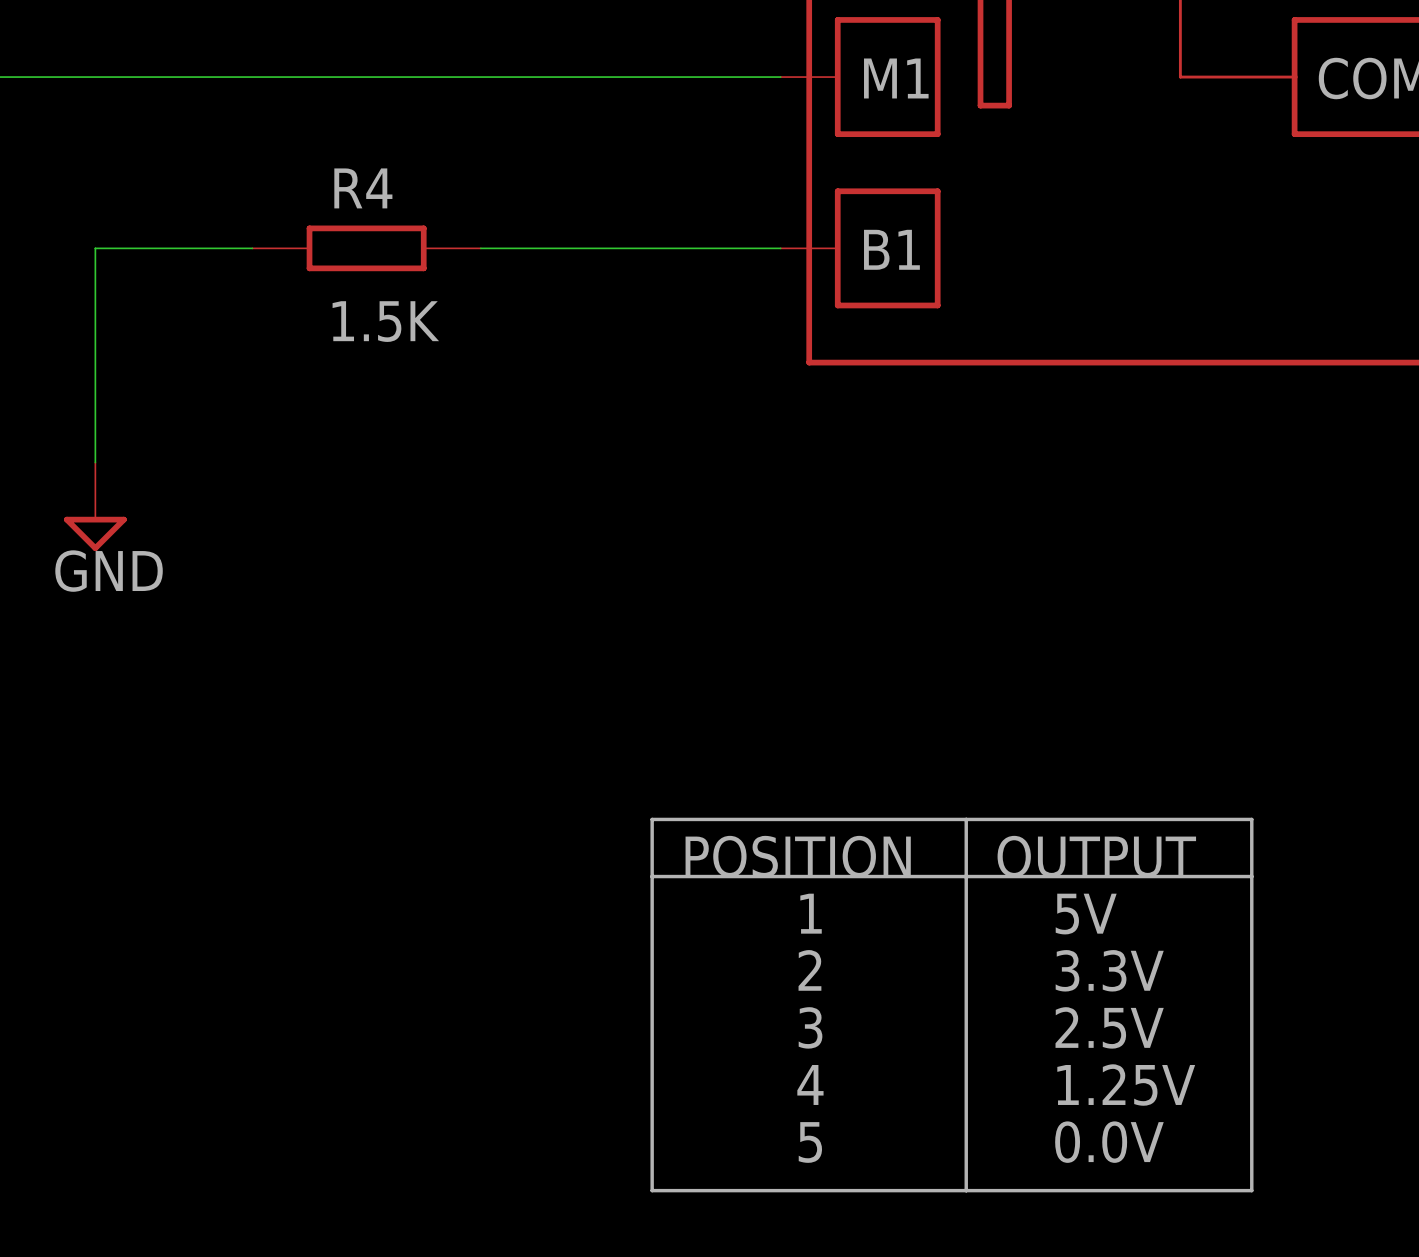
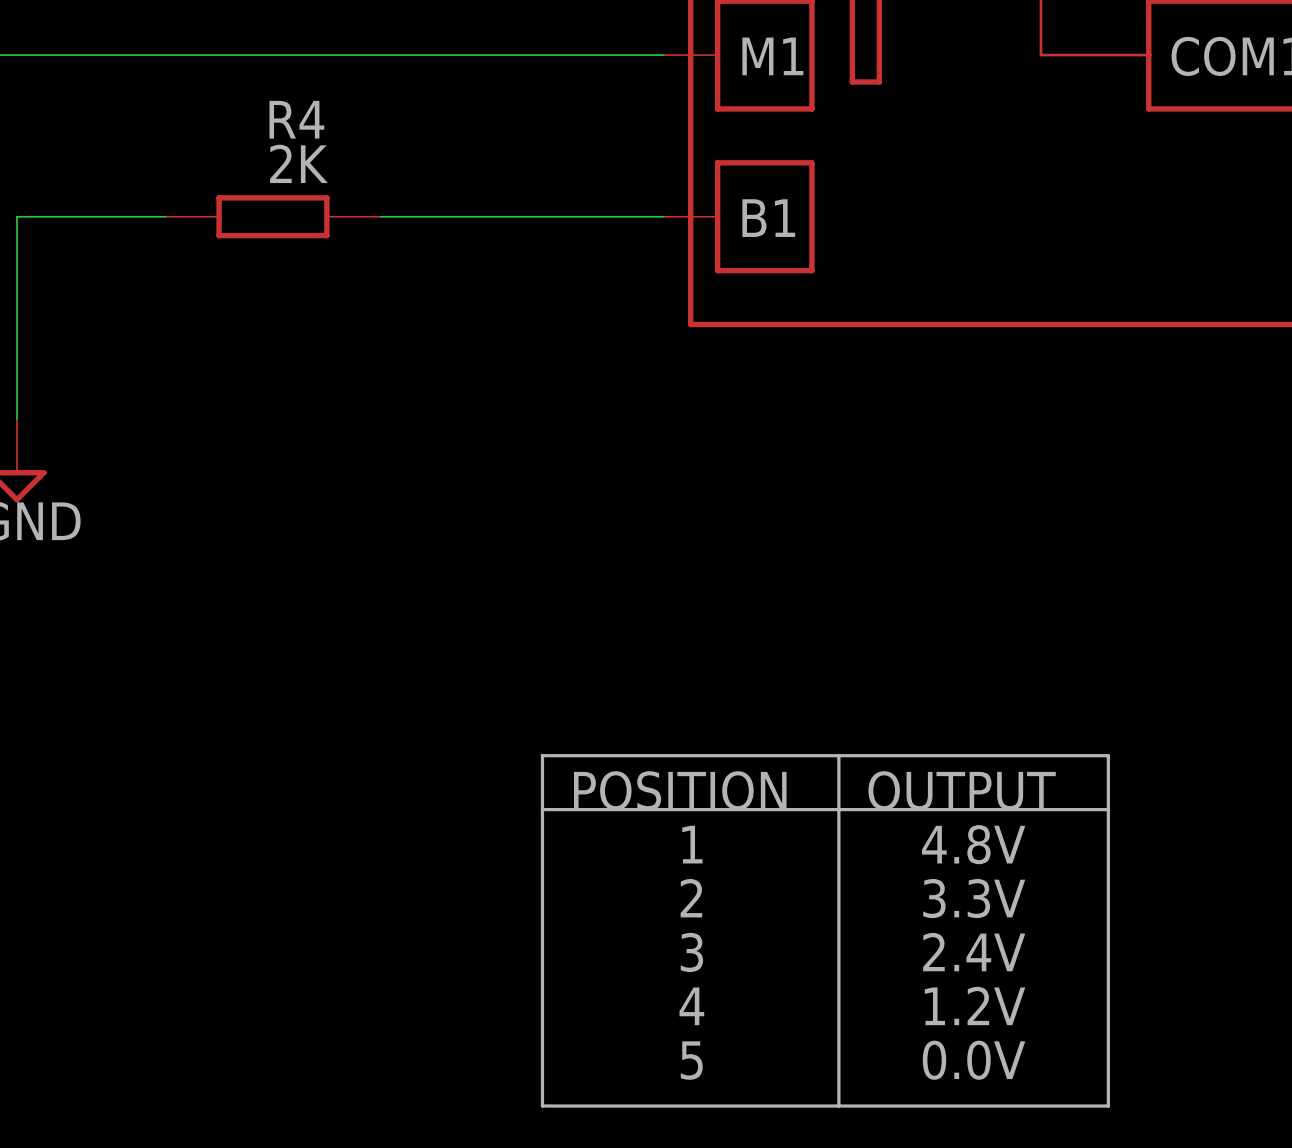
R4 name position: R4 (363, 188) -> R4 (296, 119)
R4 value: 1.5K (385, 321) -> 2K (298, 163)
text: 5V (1086, 914) -> 4.8V (973, 844)
text: 2.5V (1109, 1027) -> 2.4V (974, 952)
text: 1.25V (1126, 1085) -> 1.2V (975, 1005)

